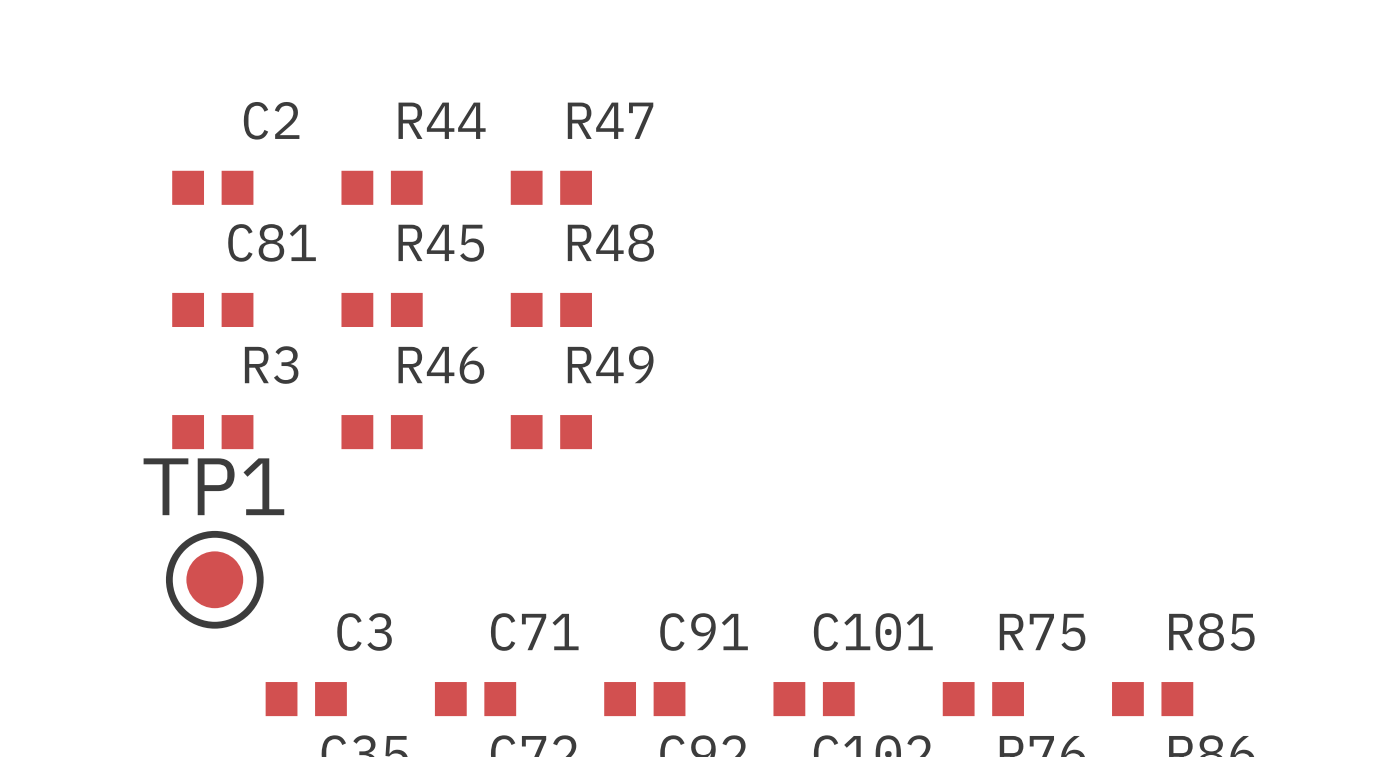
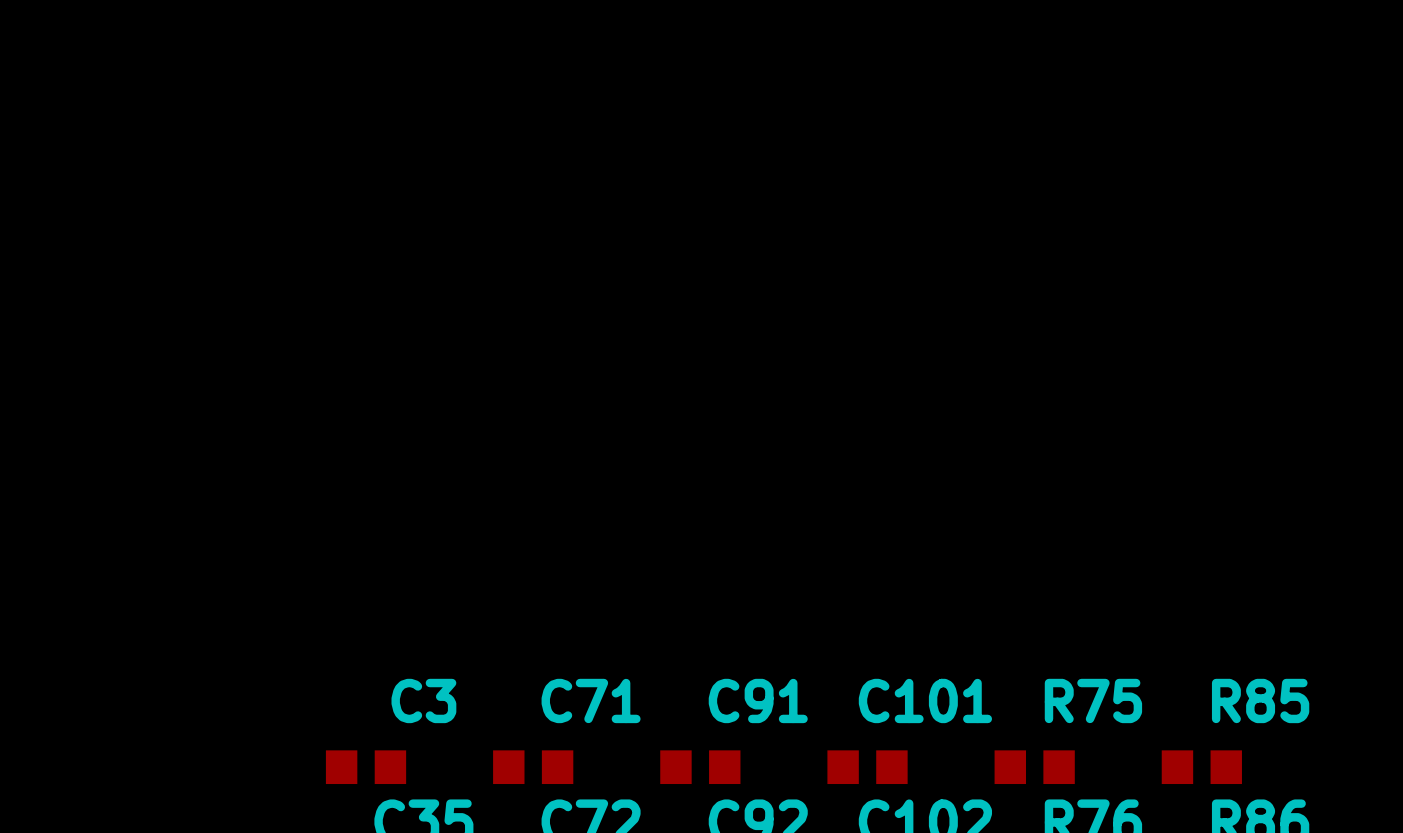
C2: (212, 187) -> none
R44: (382, 187) -> none
R47: (551, 187) -> none
C81: (212, 309) -> none
R45: (382, 309) -> none
R48: (551, 309) -> none
R3: (212, 432) -> none
R46: (382, 432) -> none
R49: (551, 432) -> none
TP1: (214, 579) -> none

